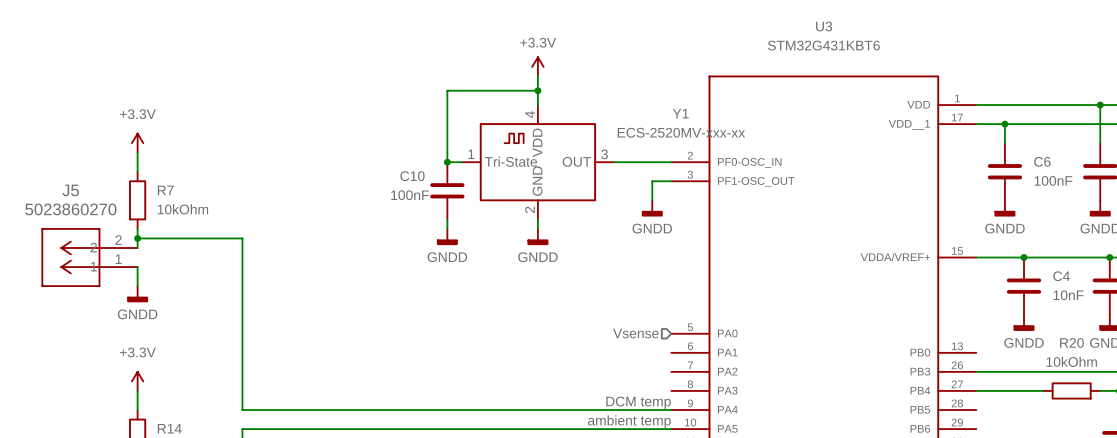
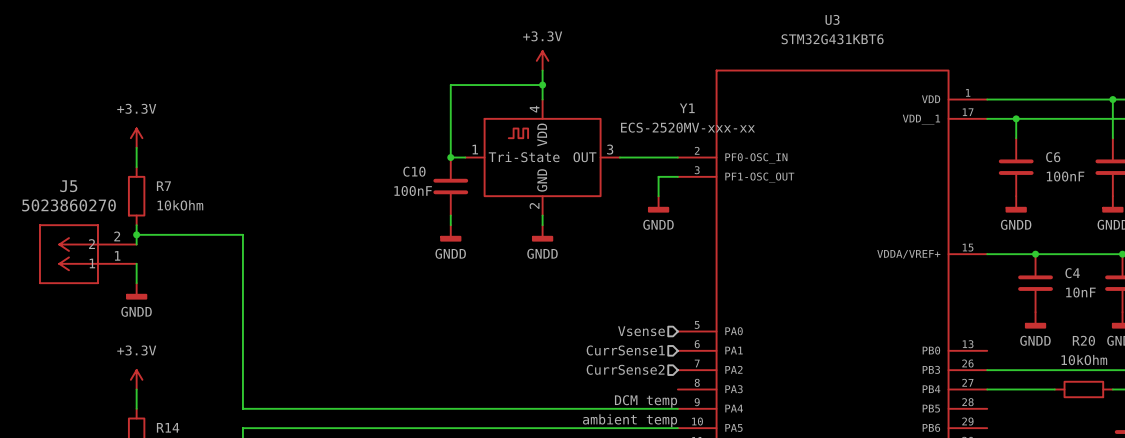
hierarchical label: none -> CurrSense1 (625, 350)
hierarchical label: none -> CurrSense2 (625, 369)

